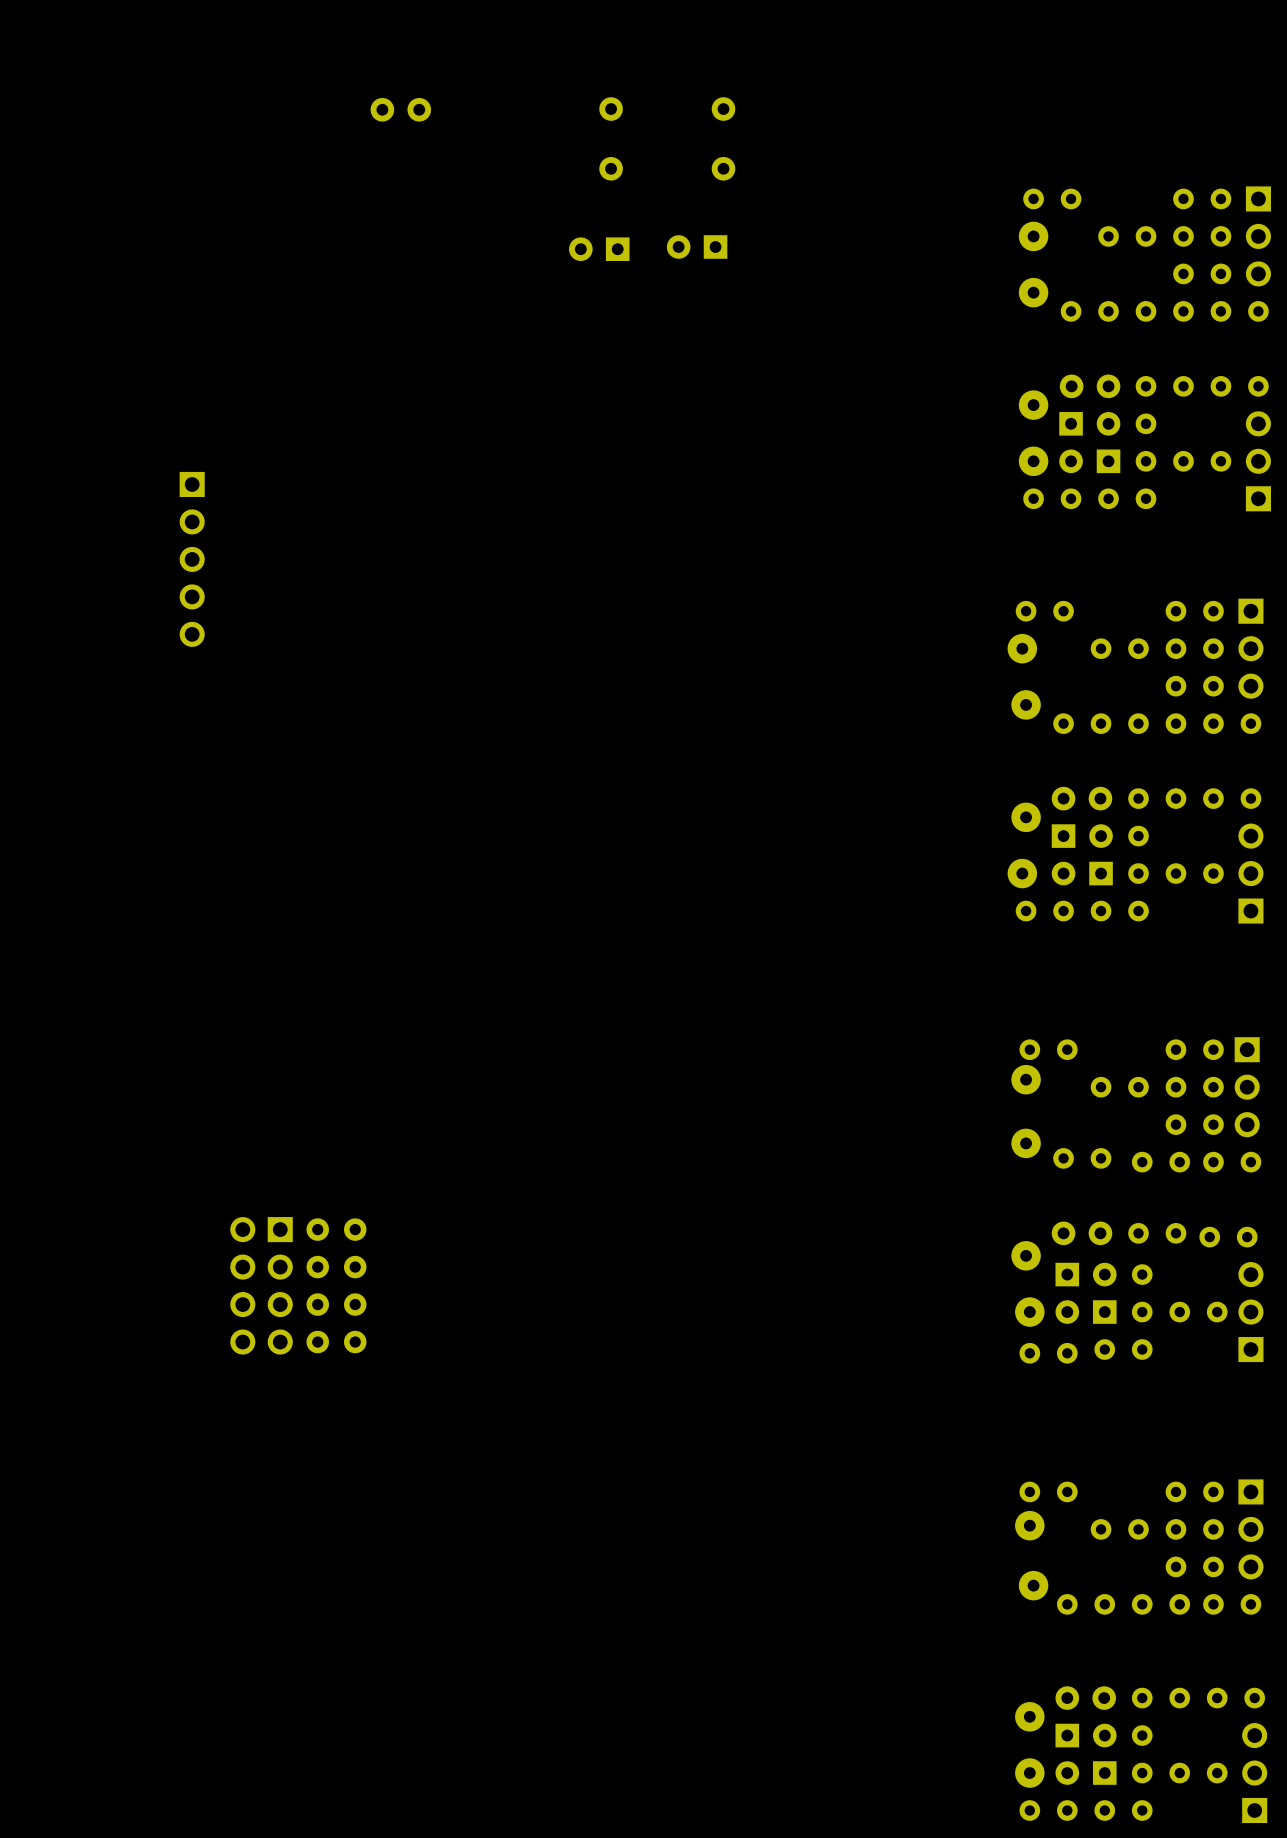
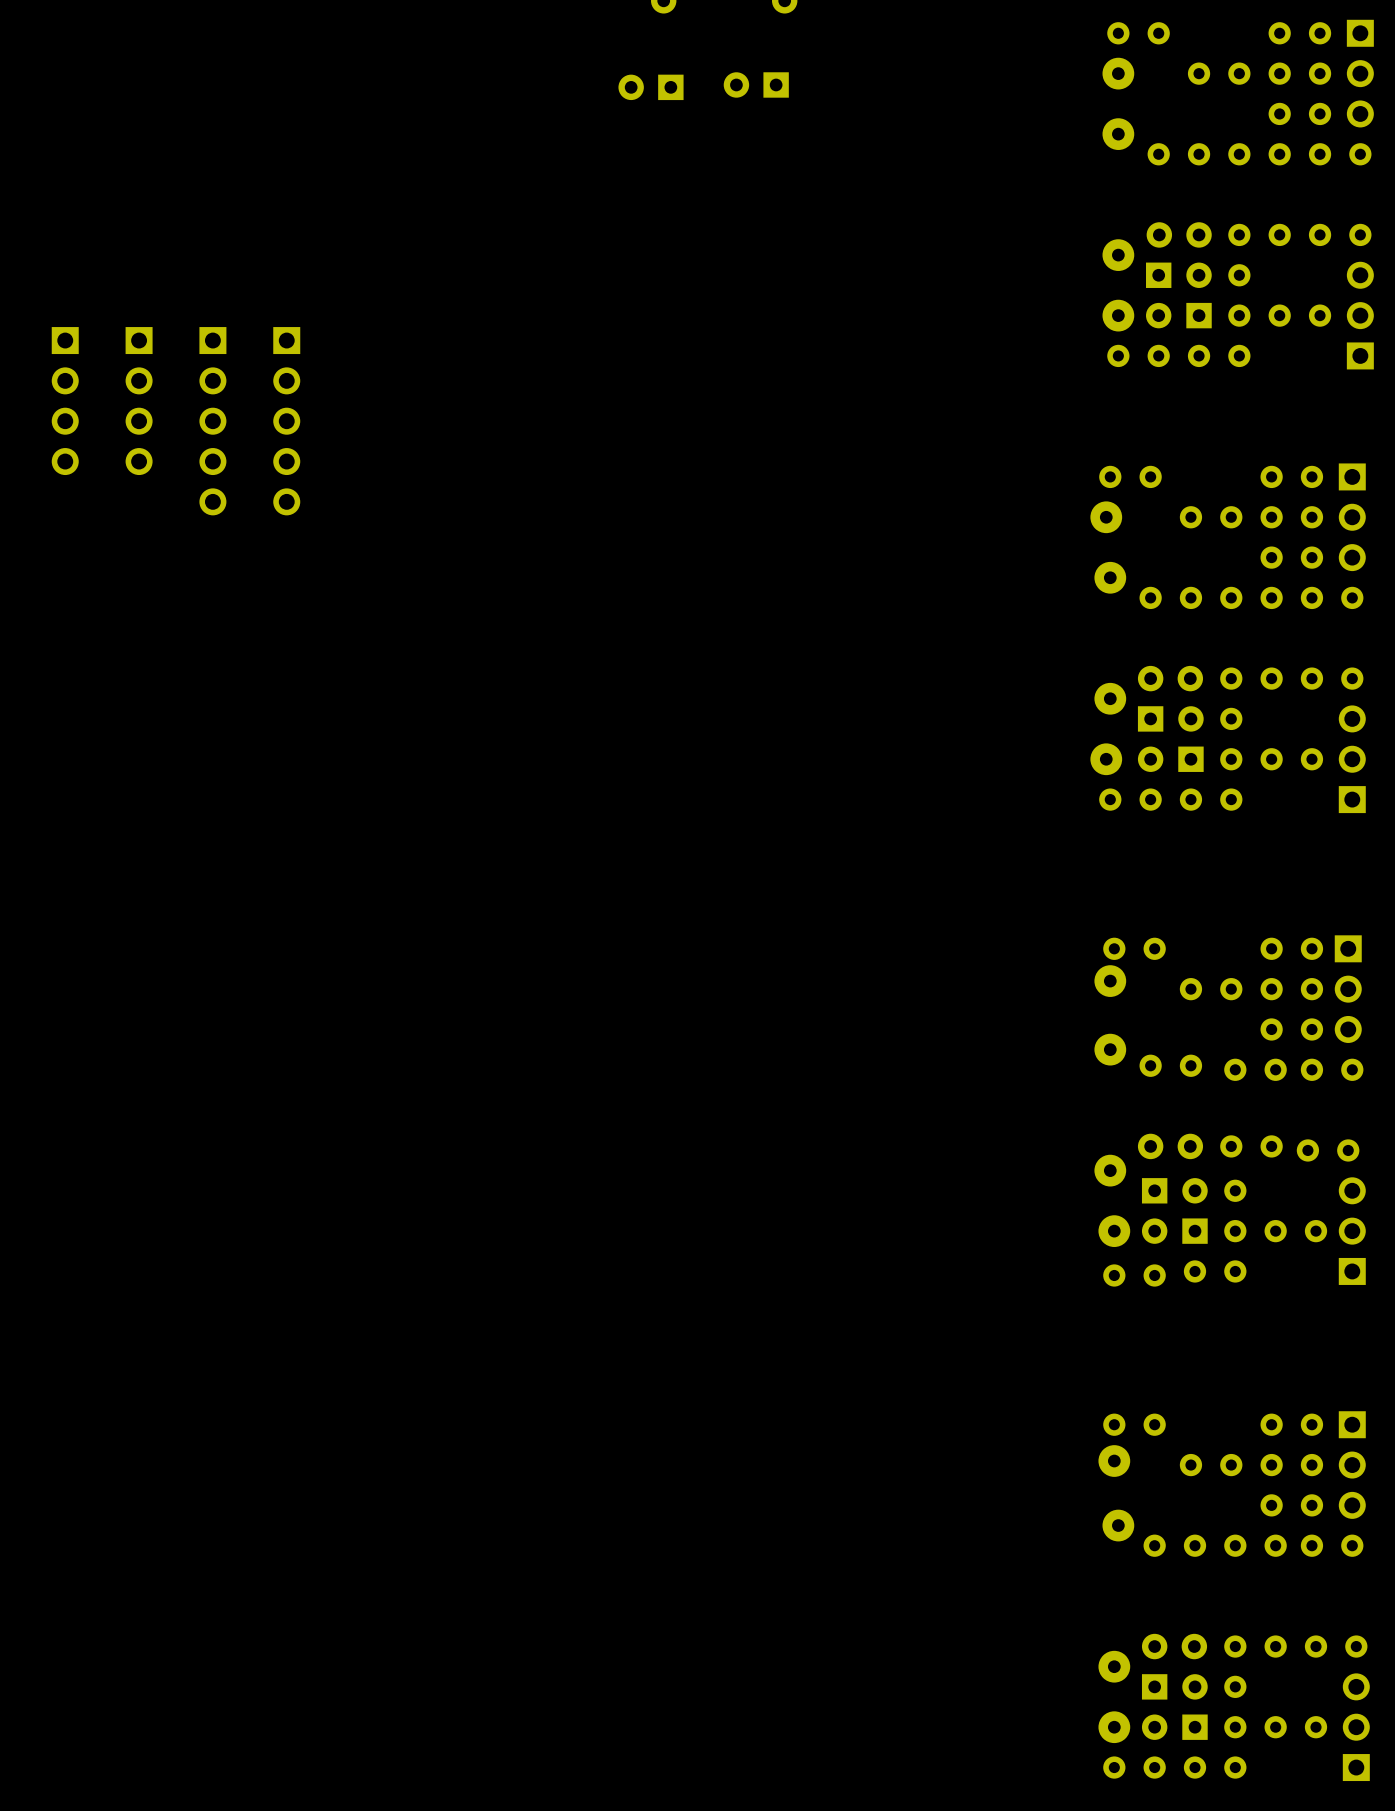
part: none -> (65, 401)
part: none -> (139, 401)
part: none -> (286, 421)
part: (261, 1285) -> none
part: (336, 1285) -> none

